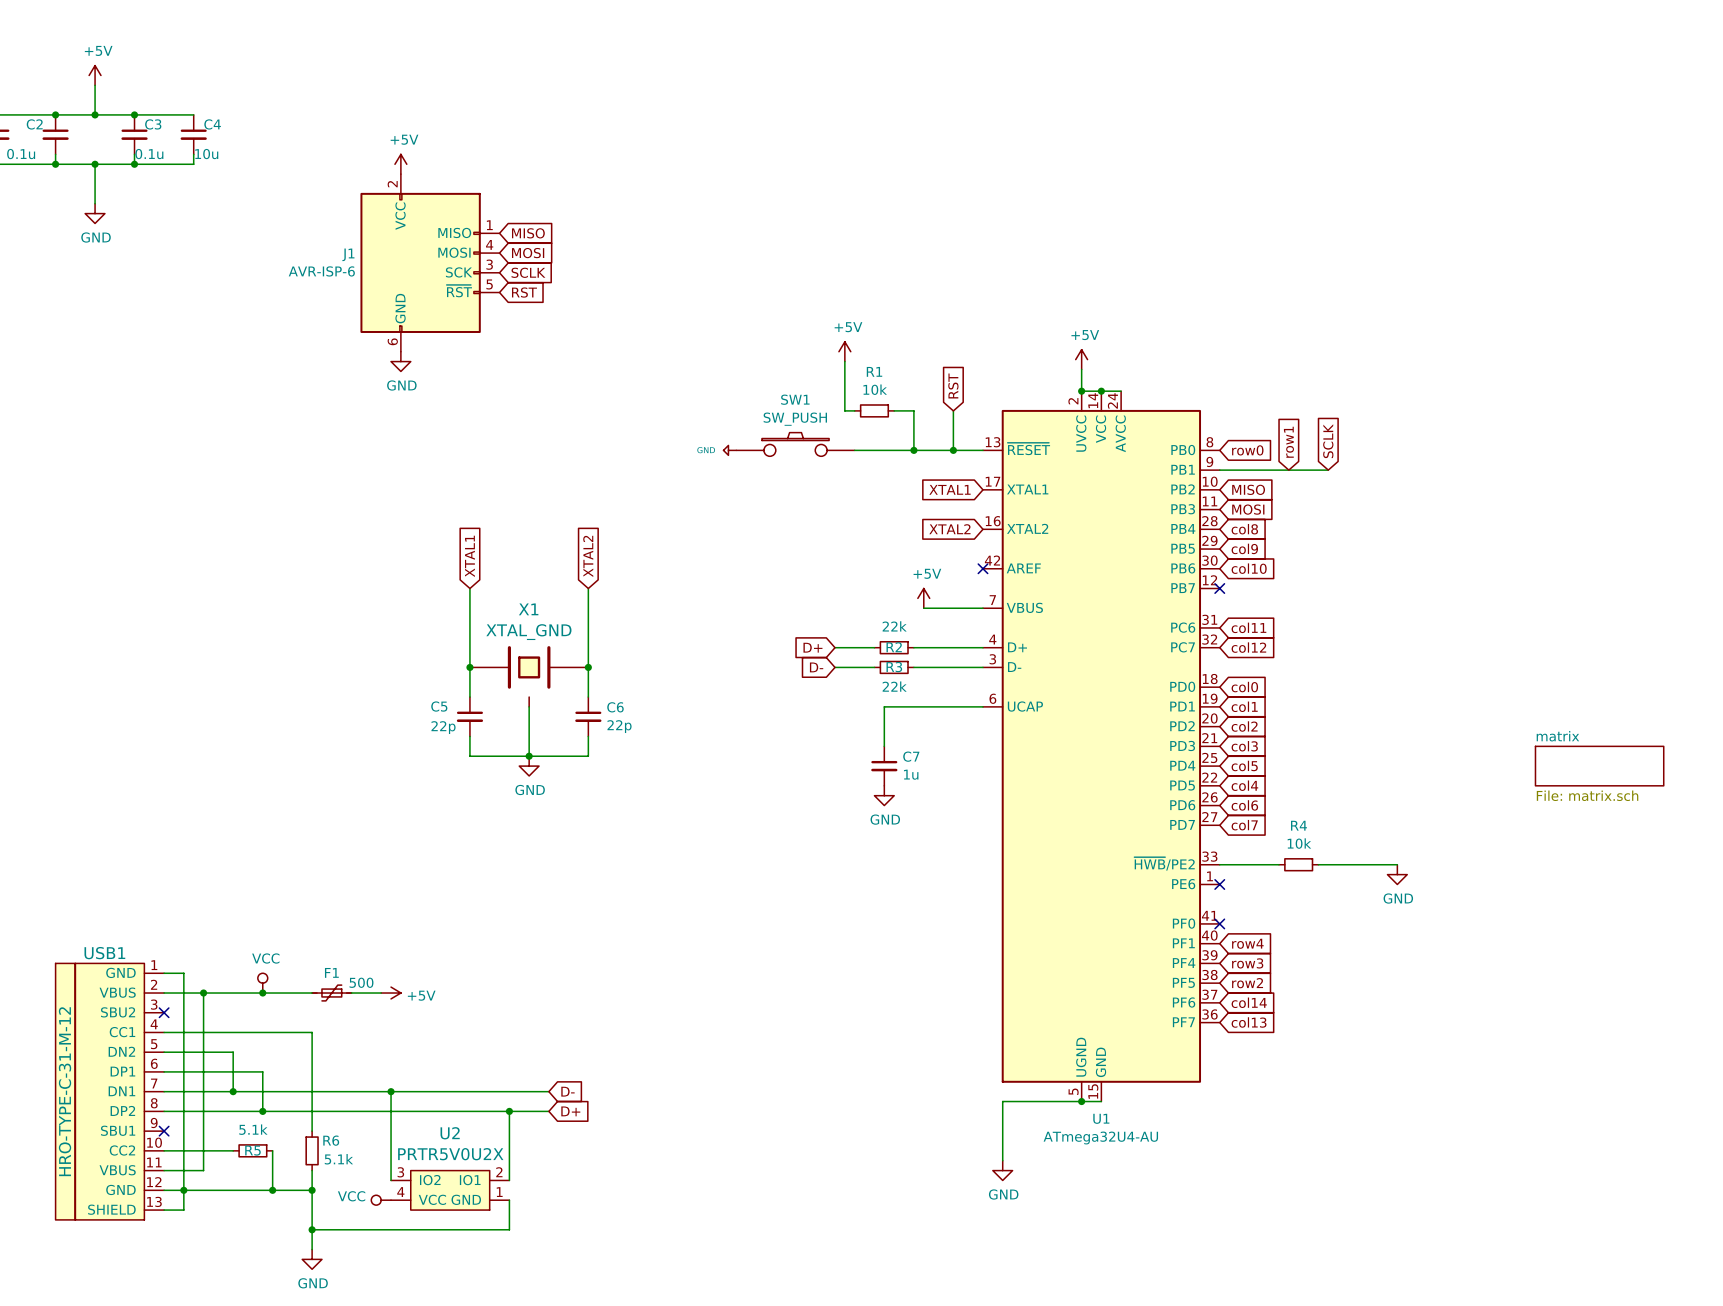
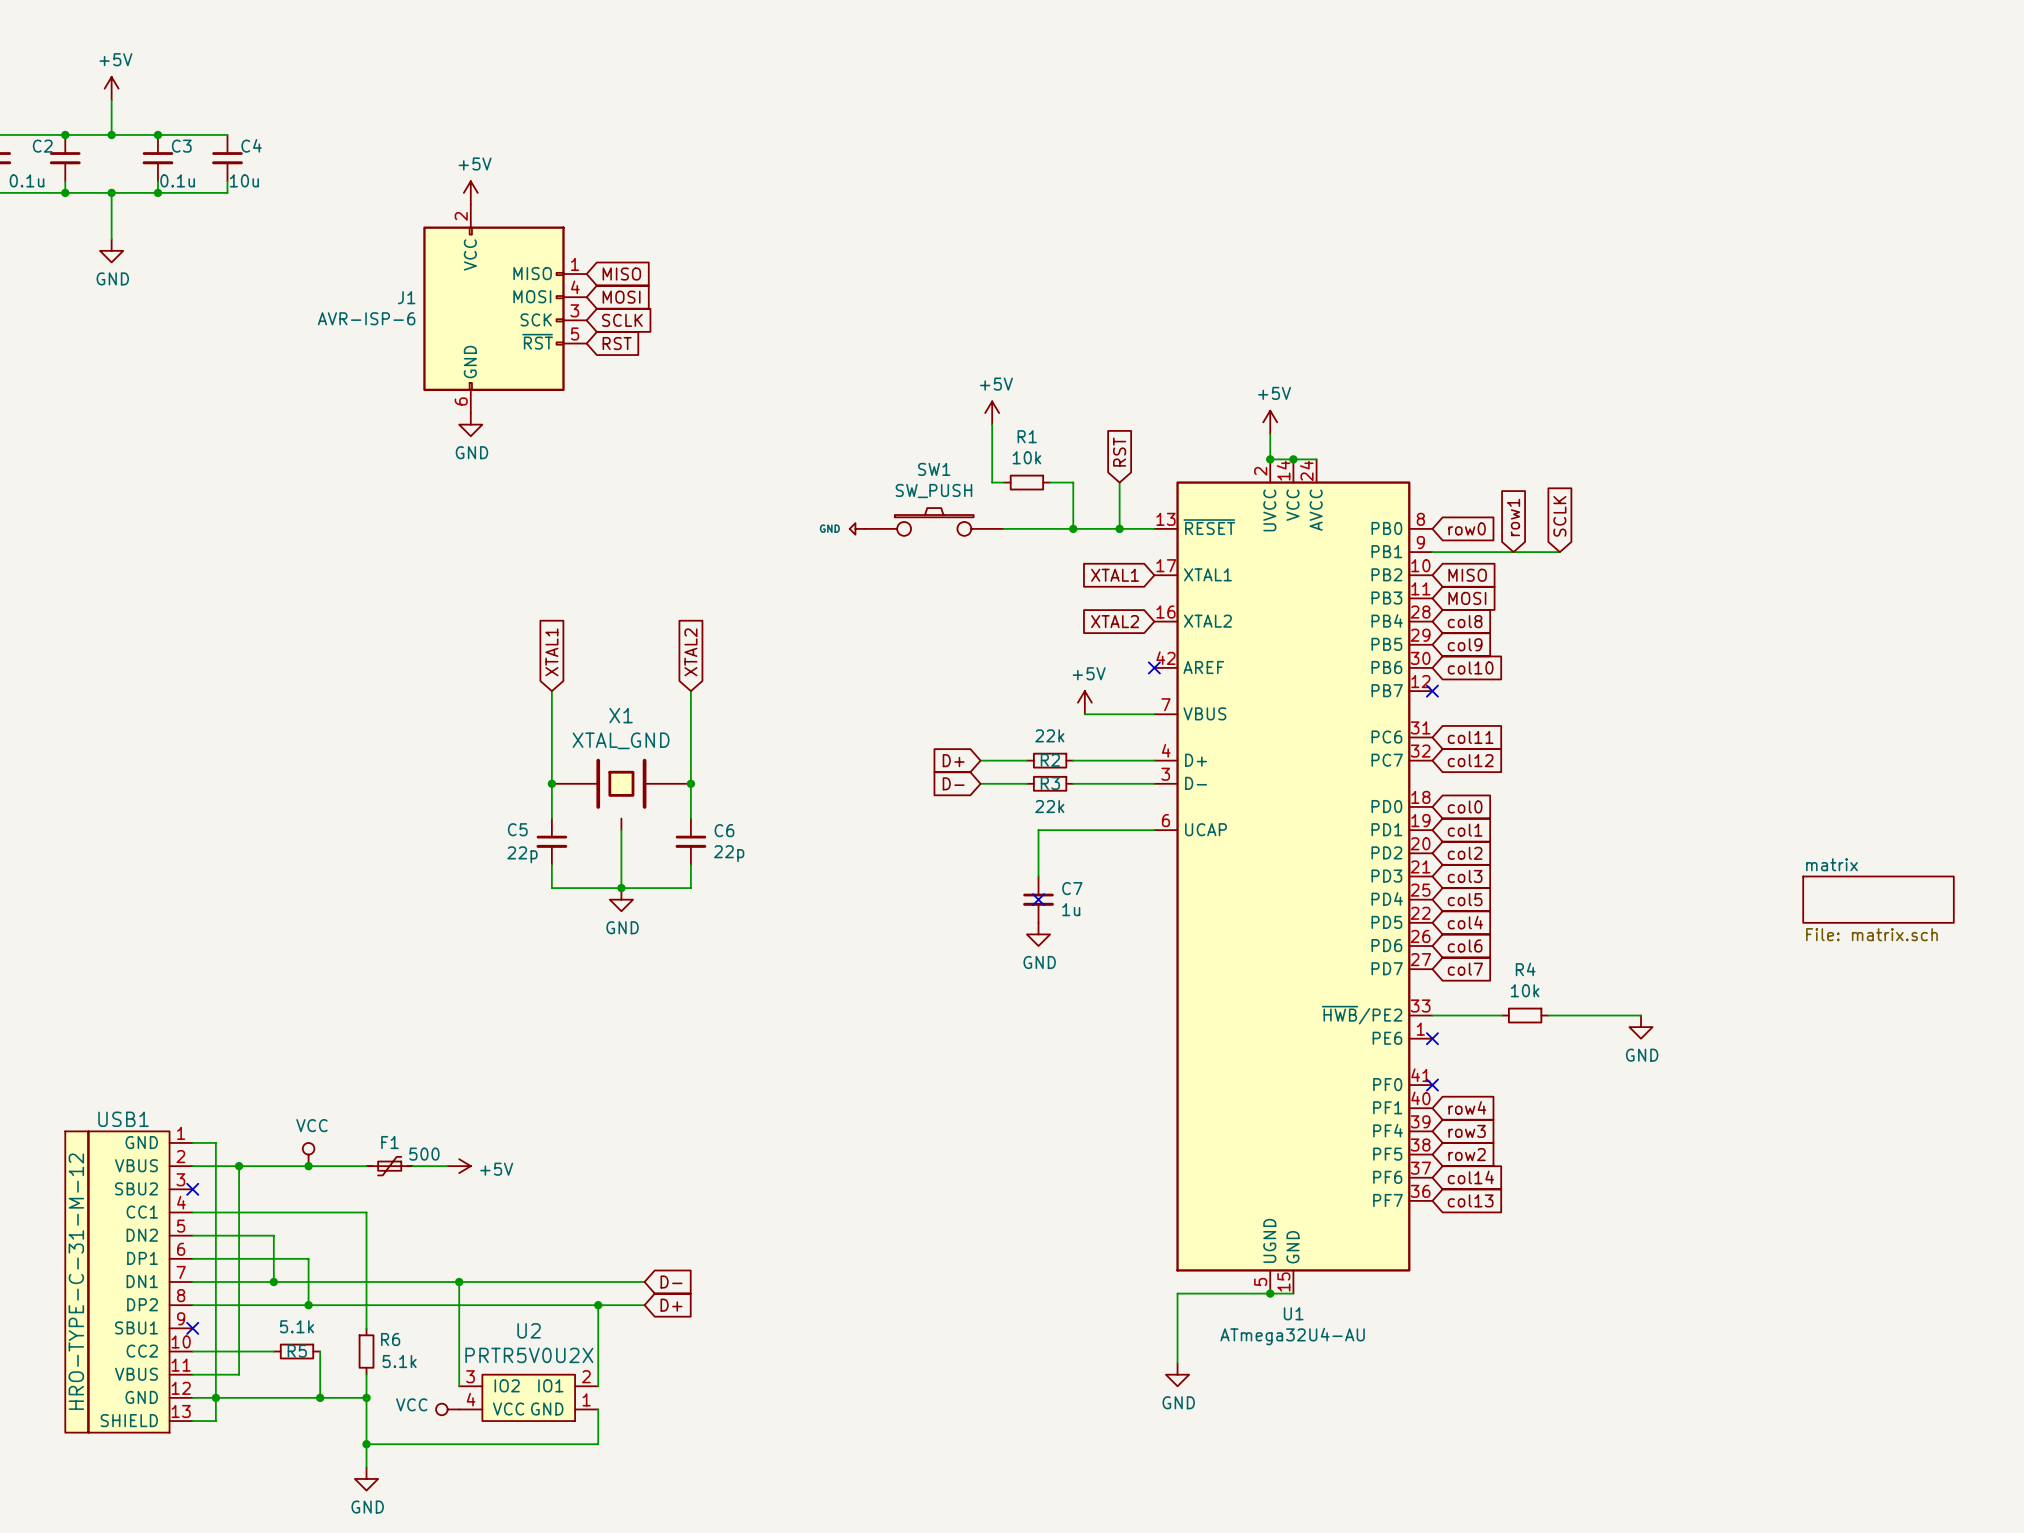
no-connect mark: none -> (1038, 899)

